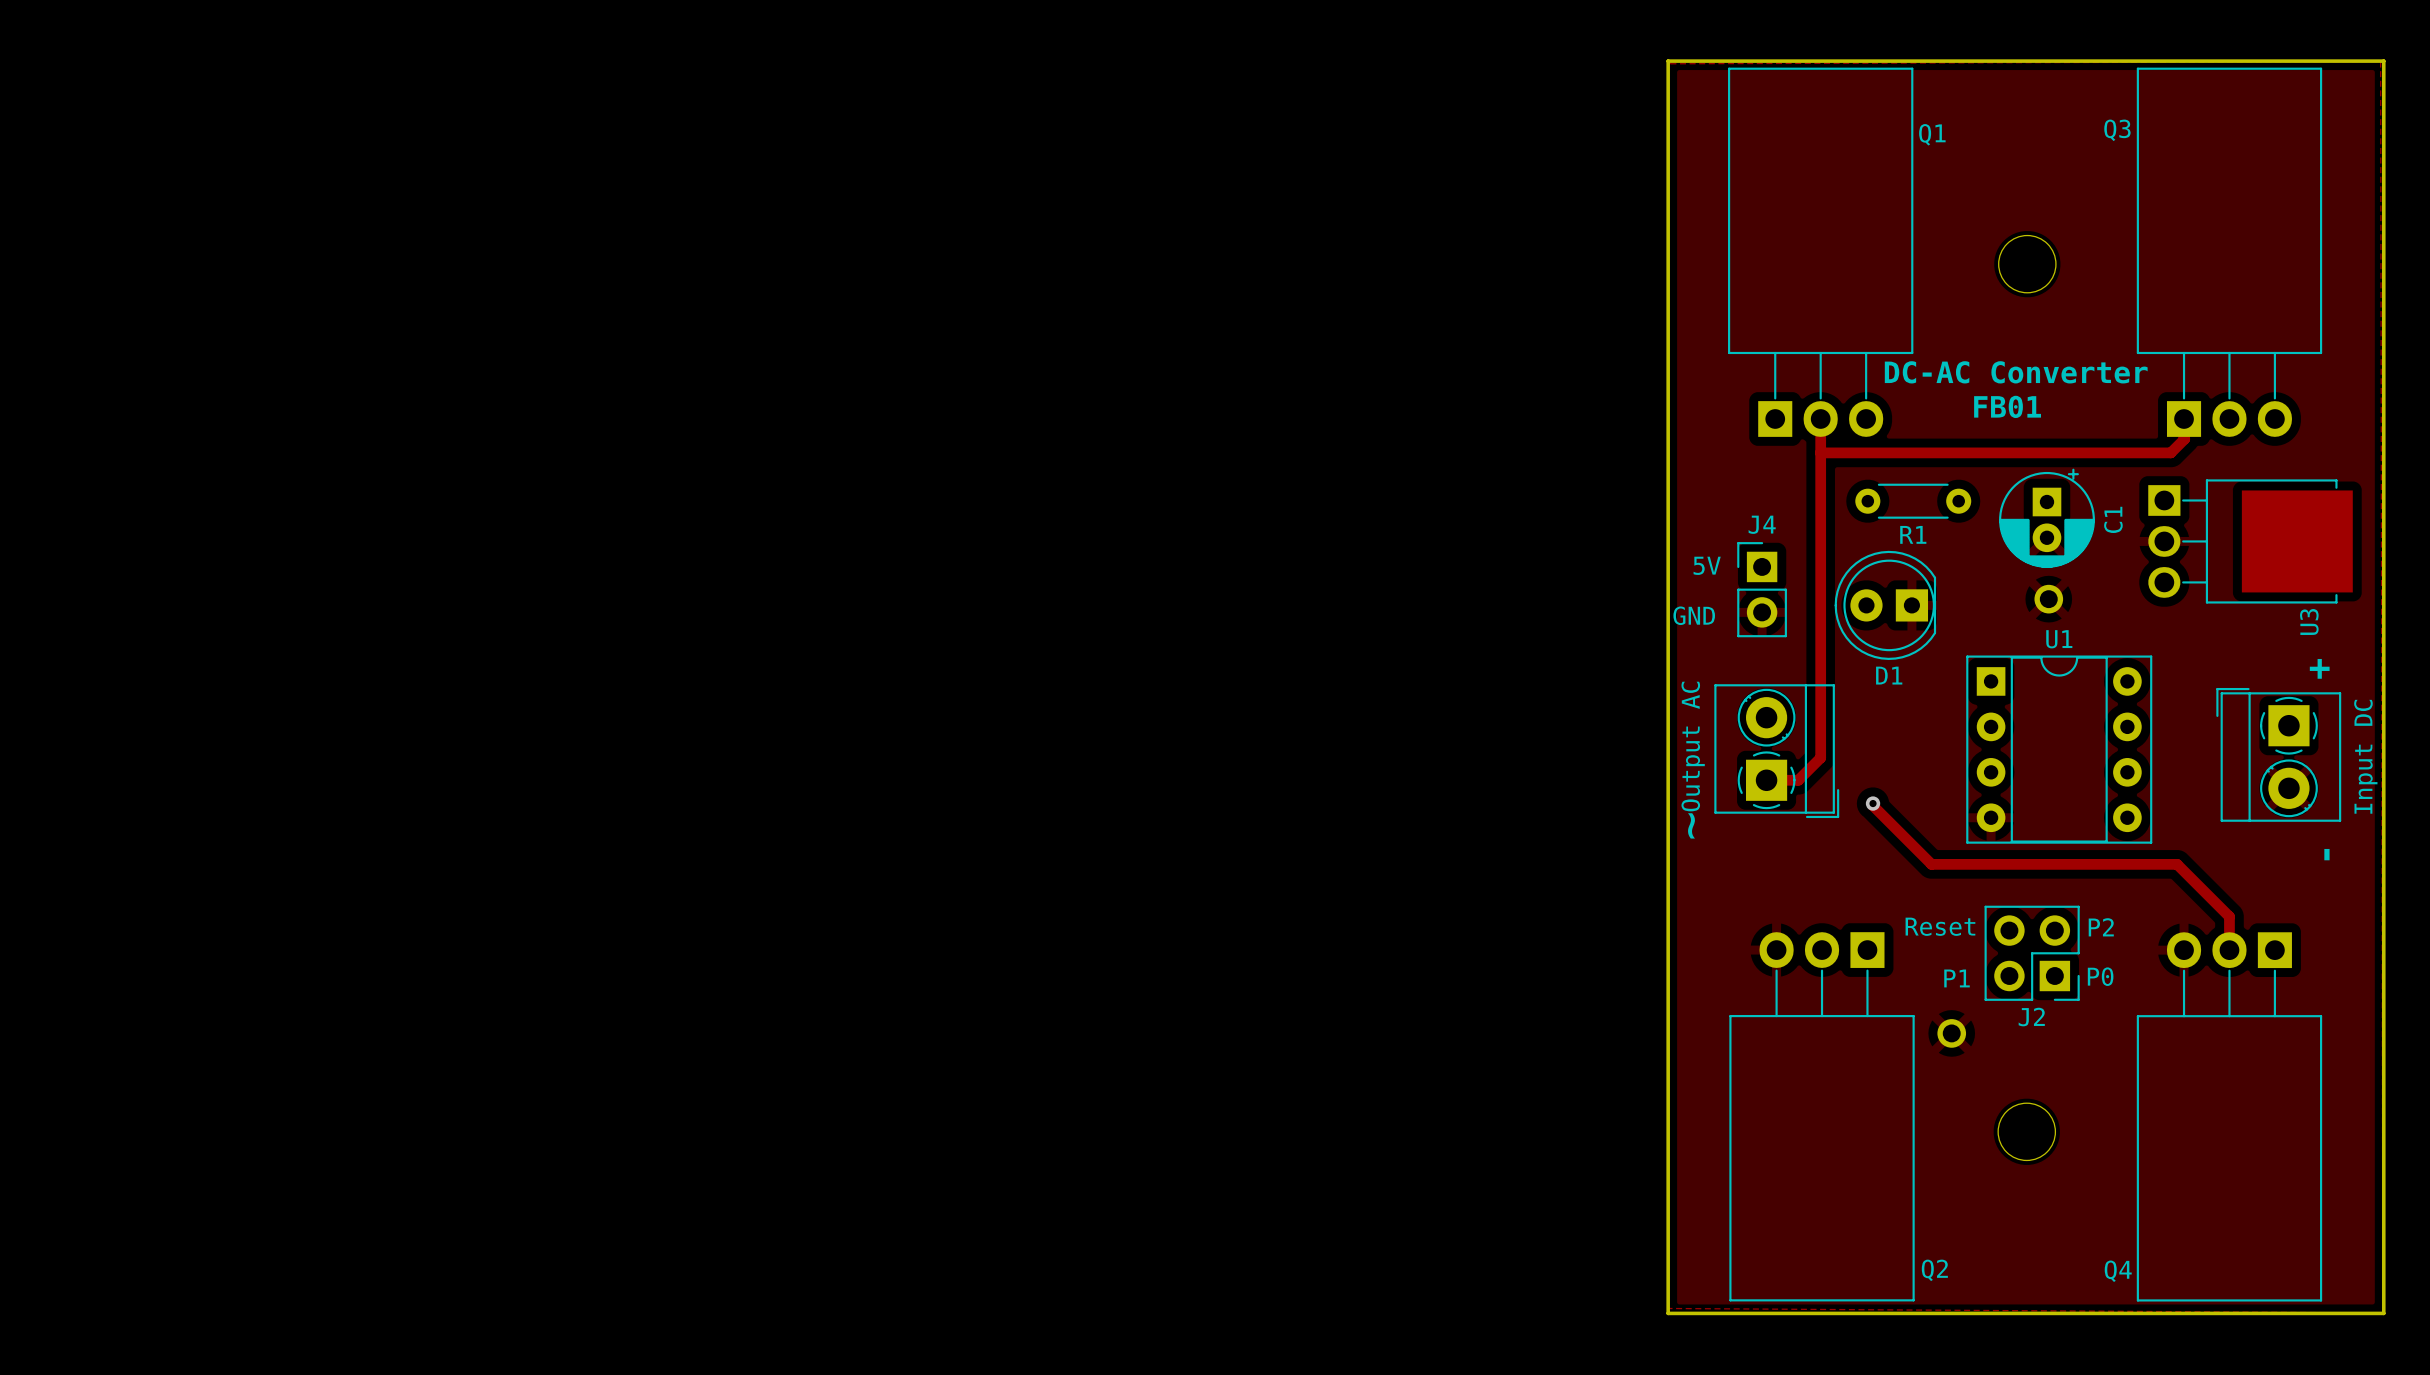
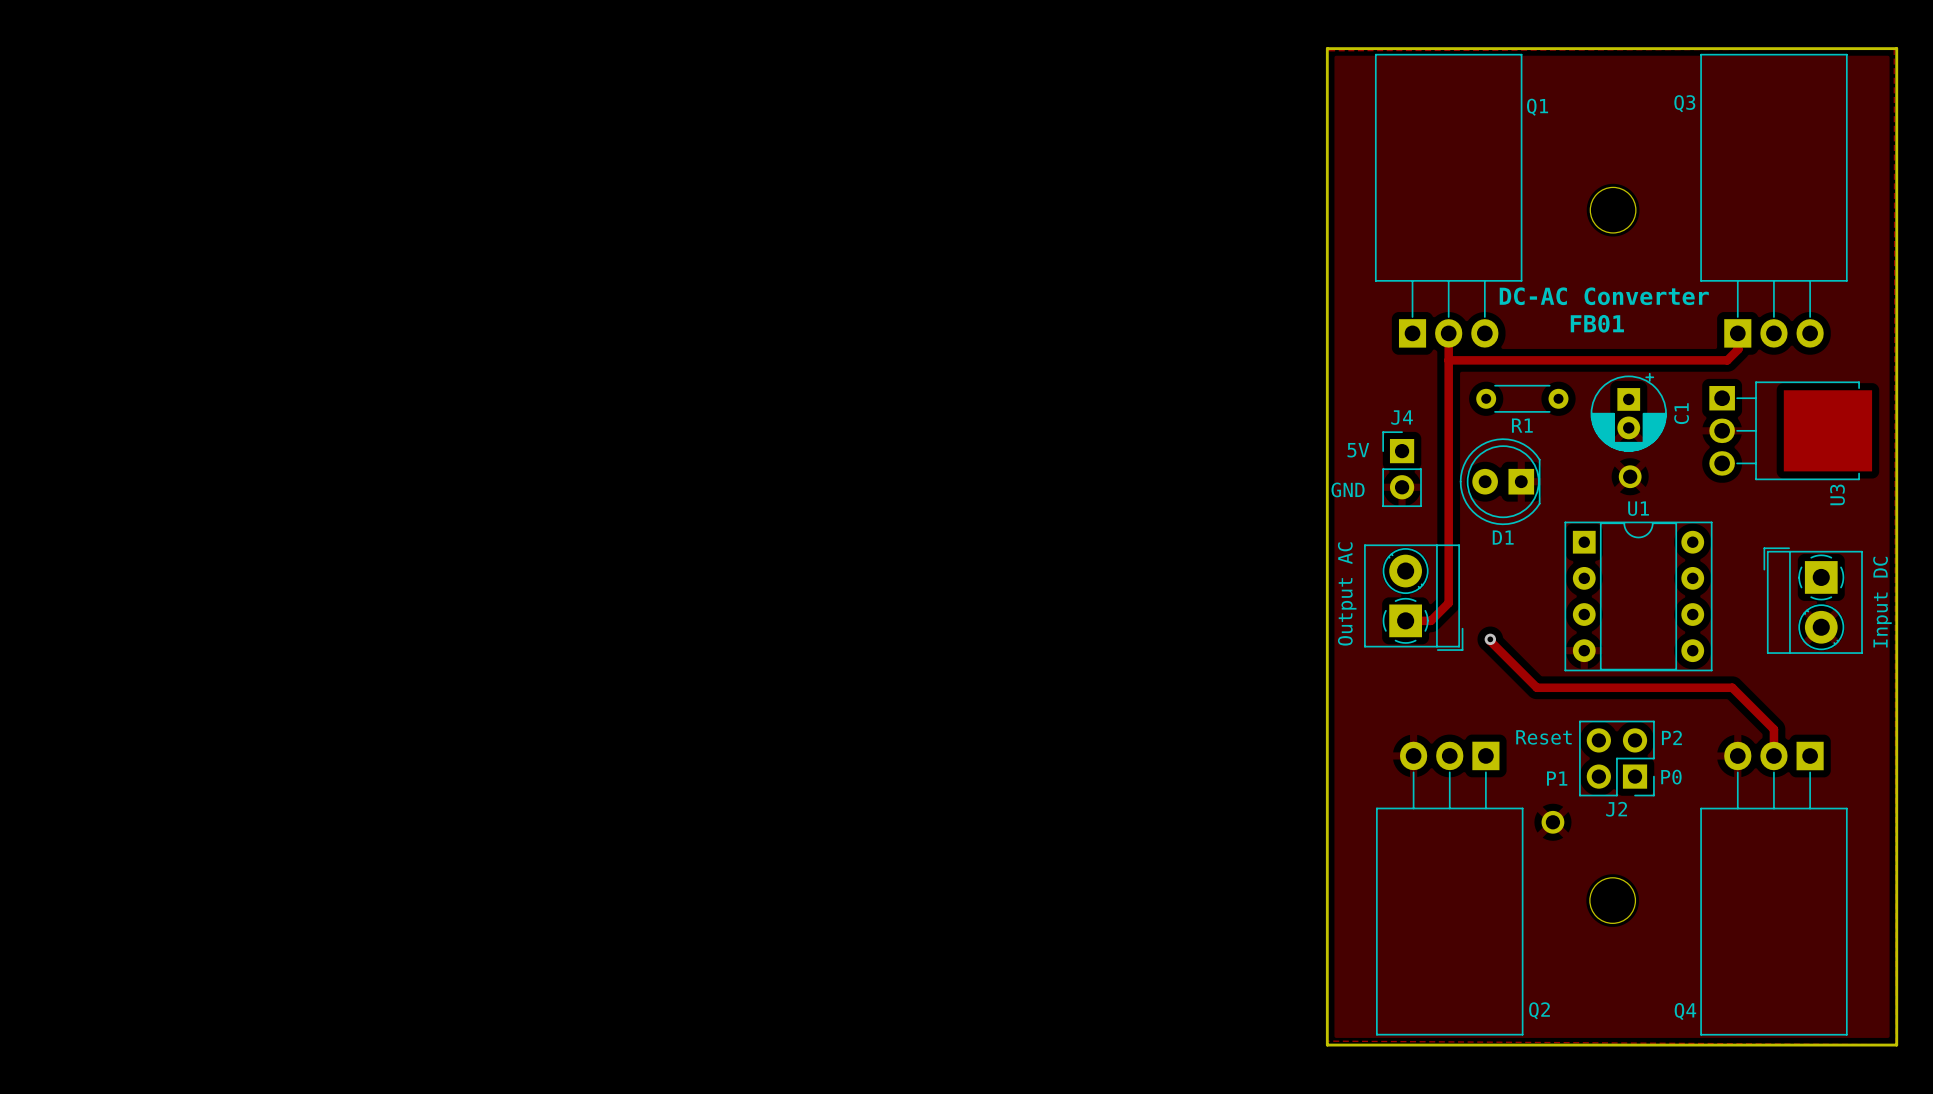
text: + (2319, 668) -> none
text: ~ (1691, 825) -> none
text: - (2326, 854) -> none

